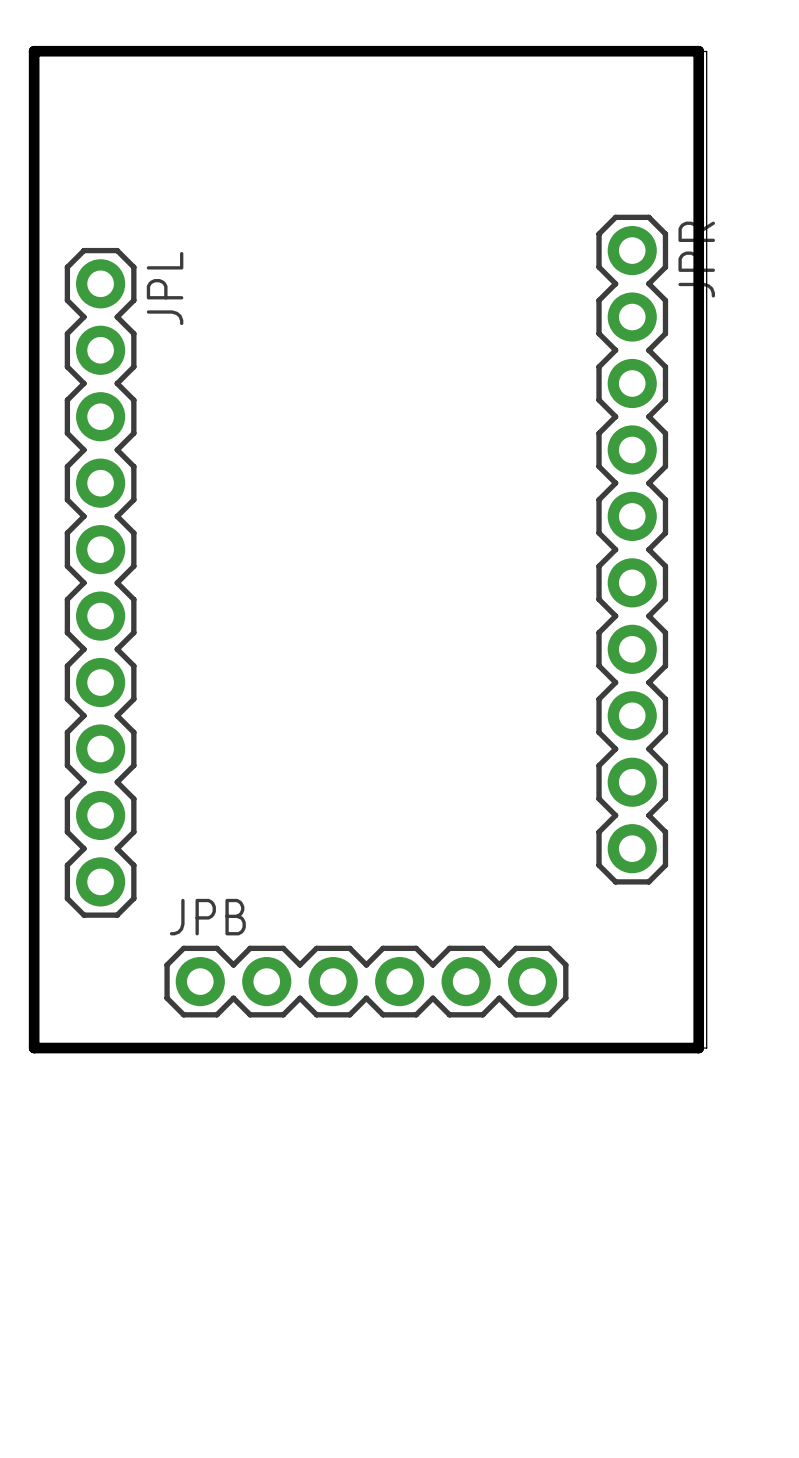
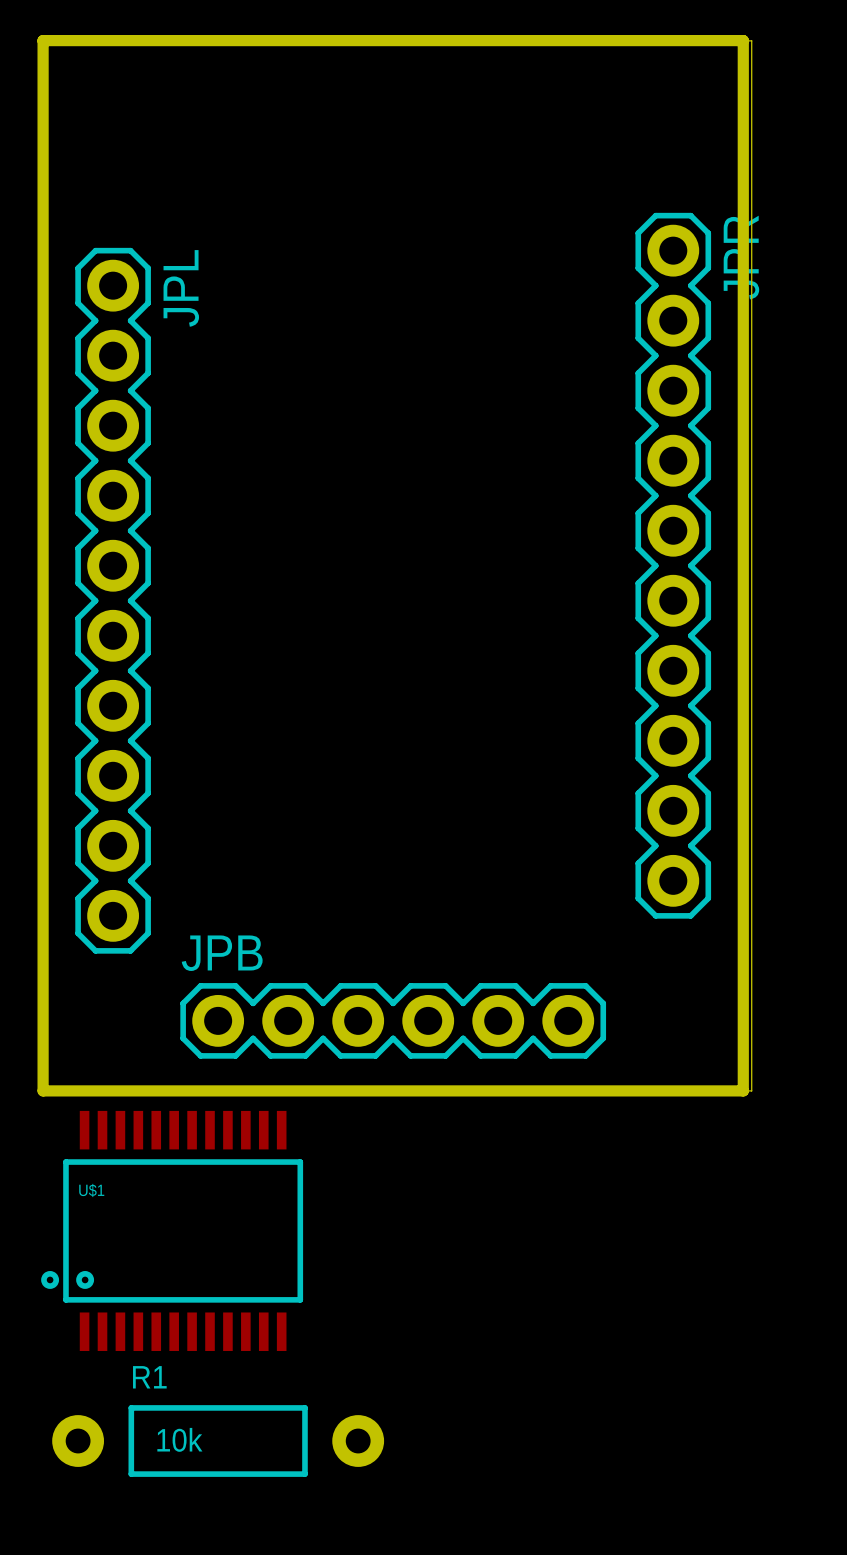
U$1: none -> (172, 1230)
R1: none -> 10k (218, 1441)

